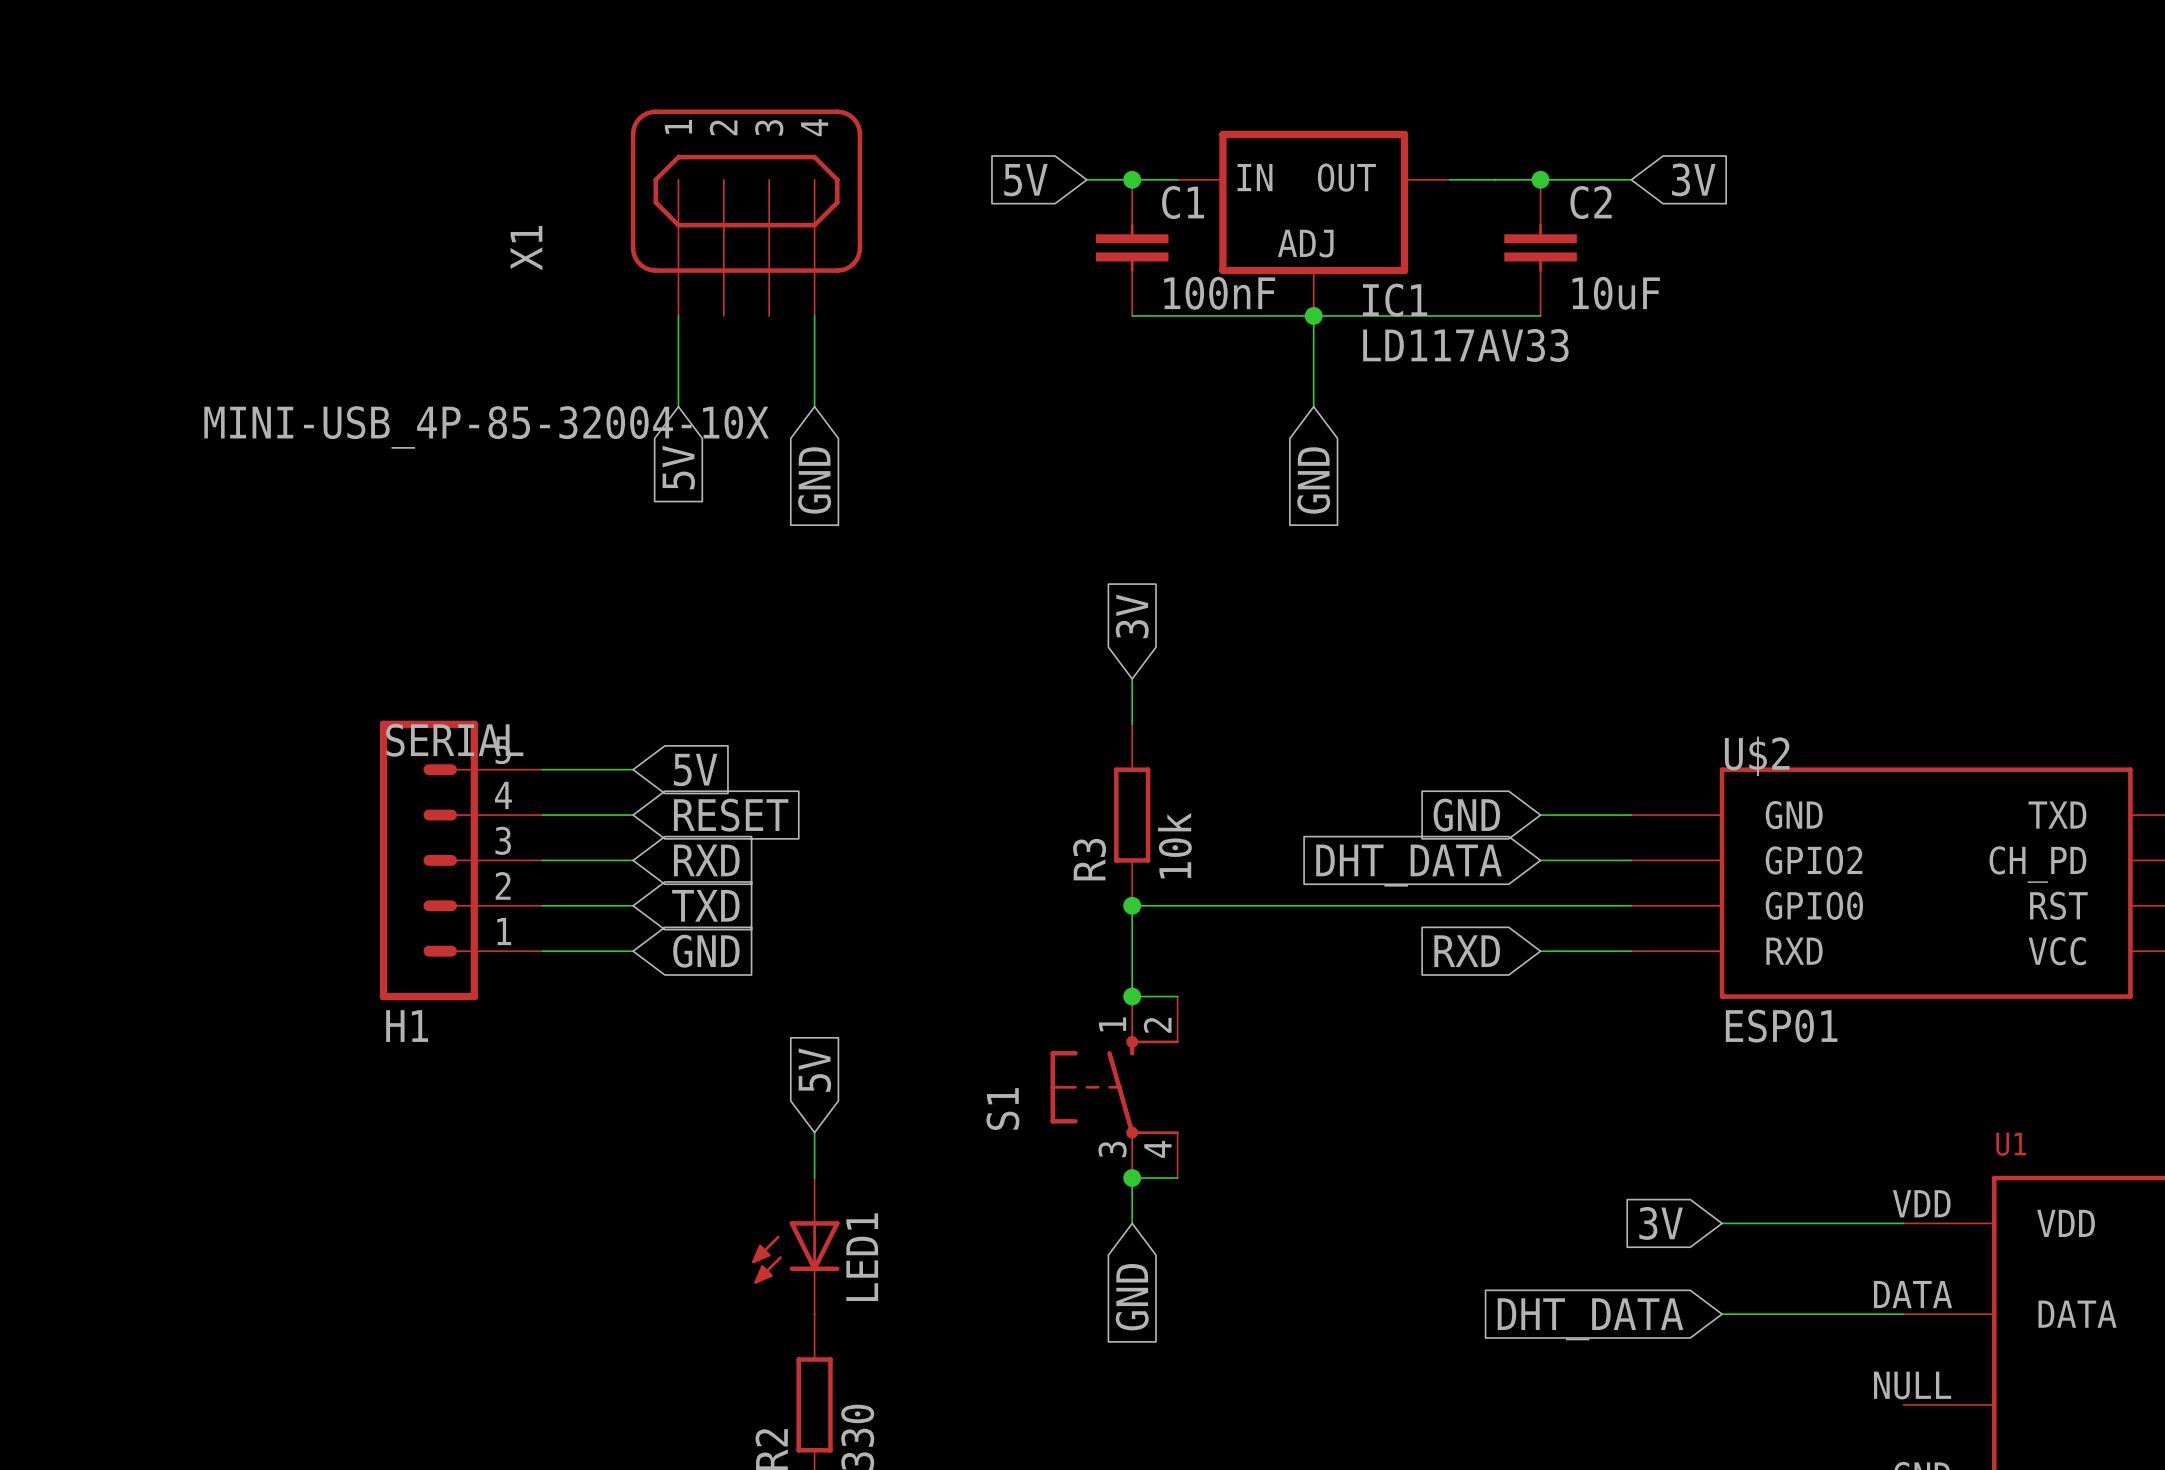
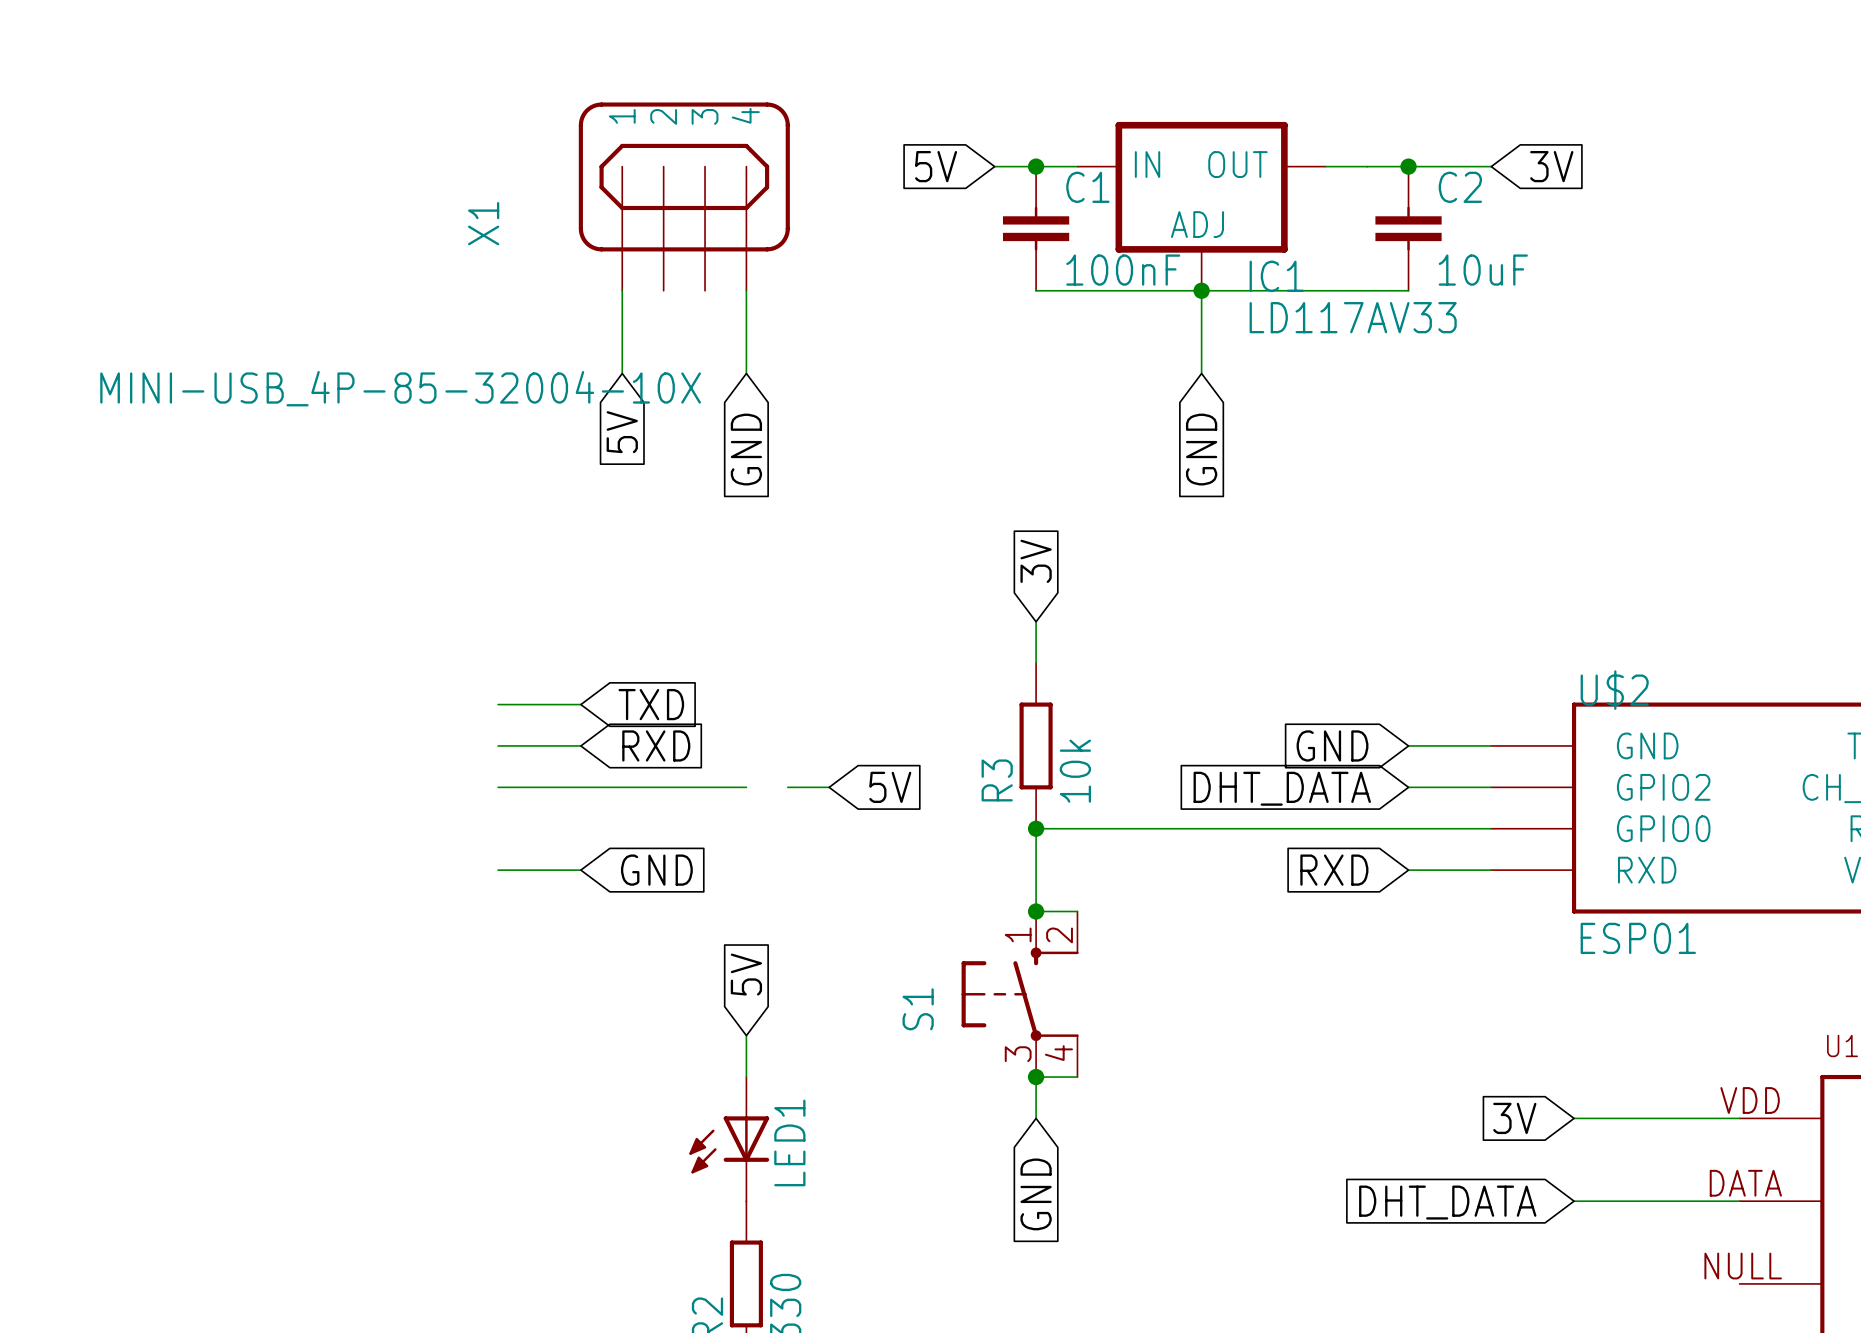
global label: 5V (695, 769) -> TXD (651, 704)
global label: RESET (731, 815) -> RXD (656, 745)
SERIAL: H1 (461, 860) -> none
wire: none -> (580, 787) (746, 787)
global label: RXD (706, 860) -> none
wire: none -> (787, 787) (829, 787)
global label: none -> 5V (890, 787)
wire: (542, 905) (633, 905) -> none
global label: TXD (705, 905) -> none

